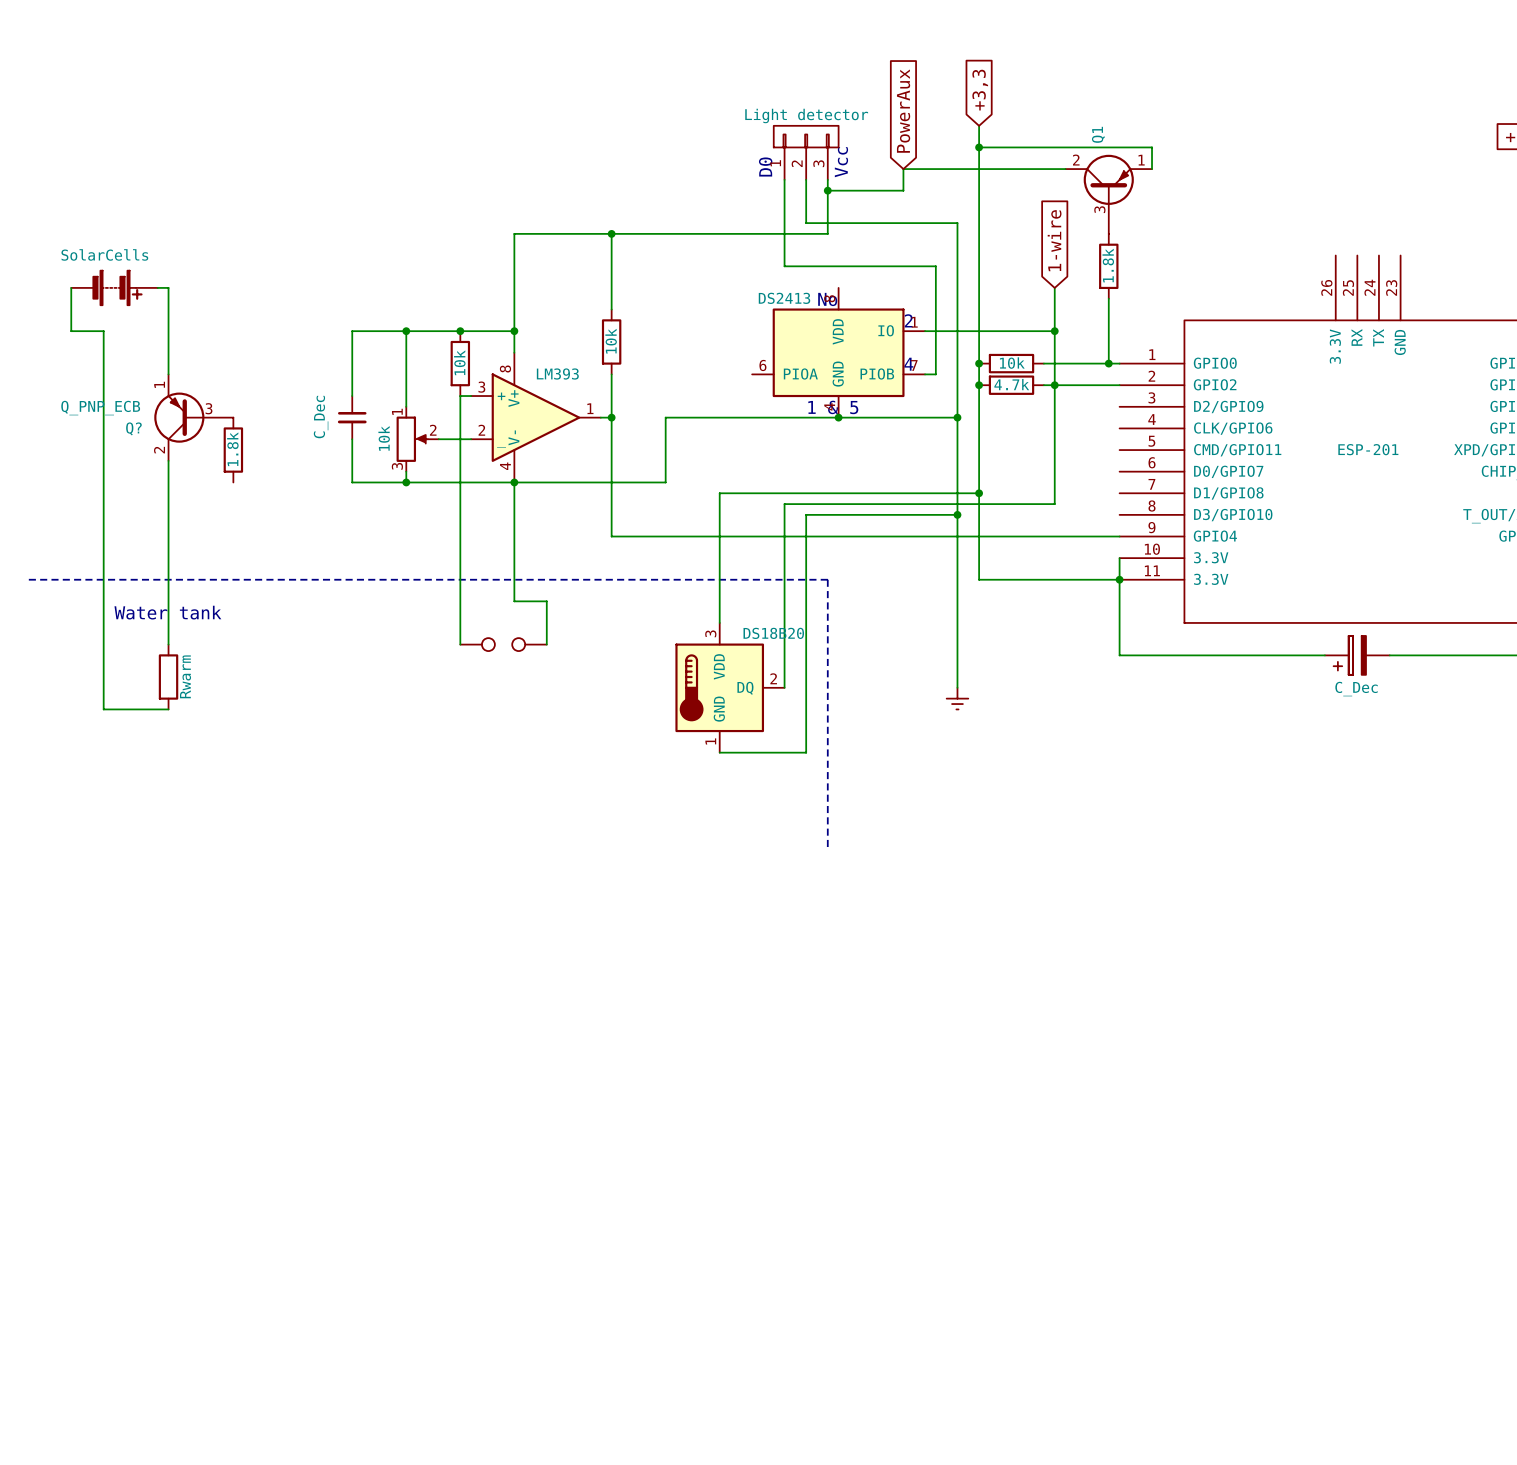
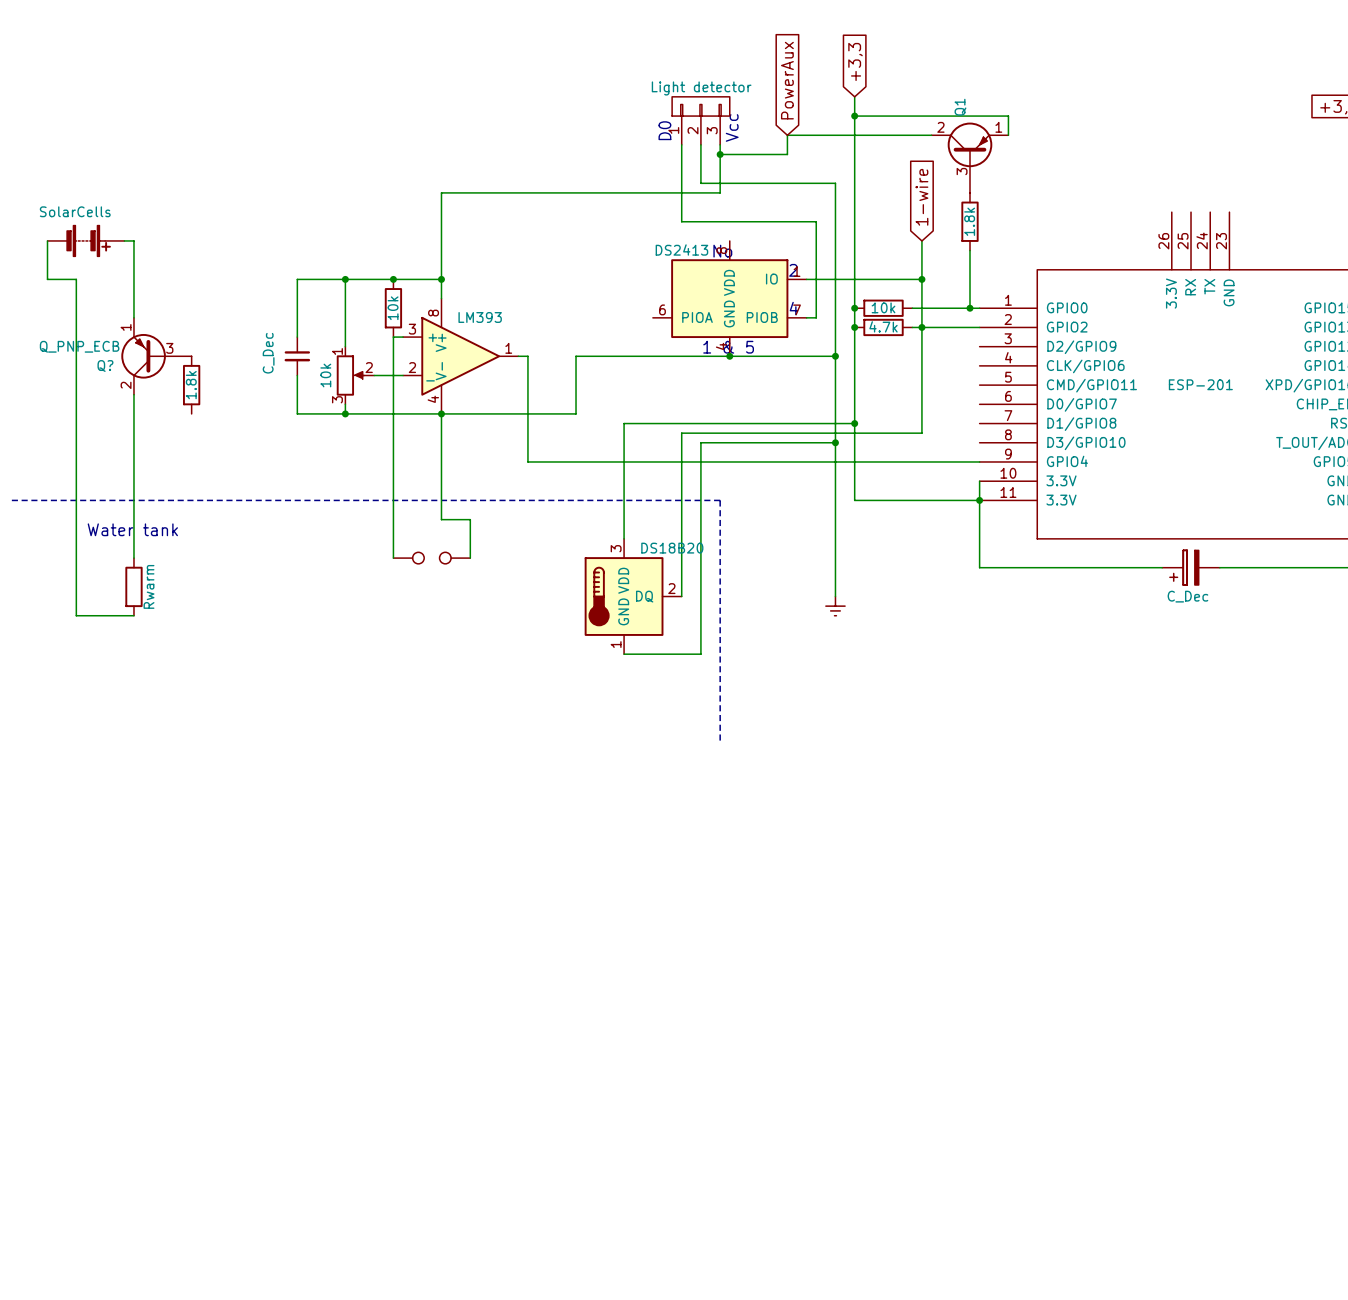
wire: (611, 233) (611, 309) -> none
junction: (611, 233) -> none
part: 10k (611, 341) -> none
wire: (611, 374) (611, 417) -> none
junction: (611, 417) -> none

